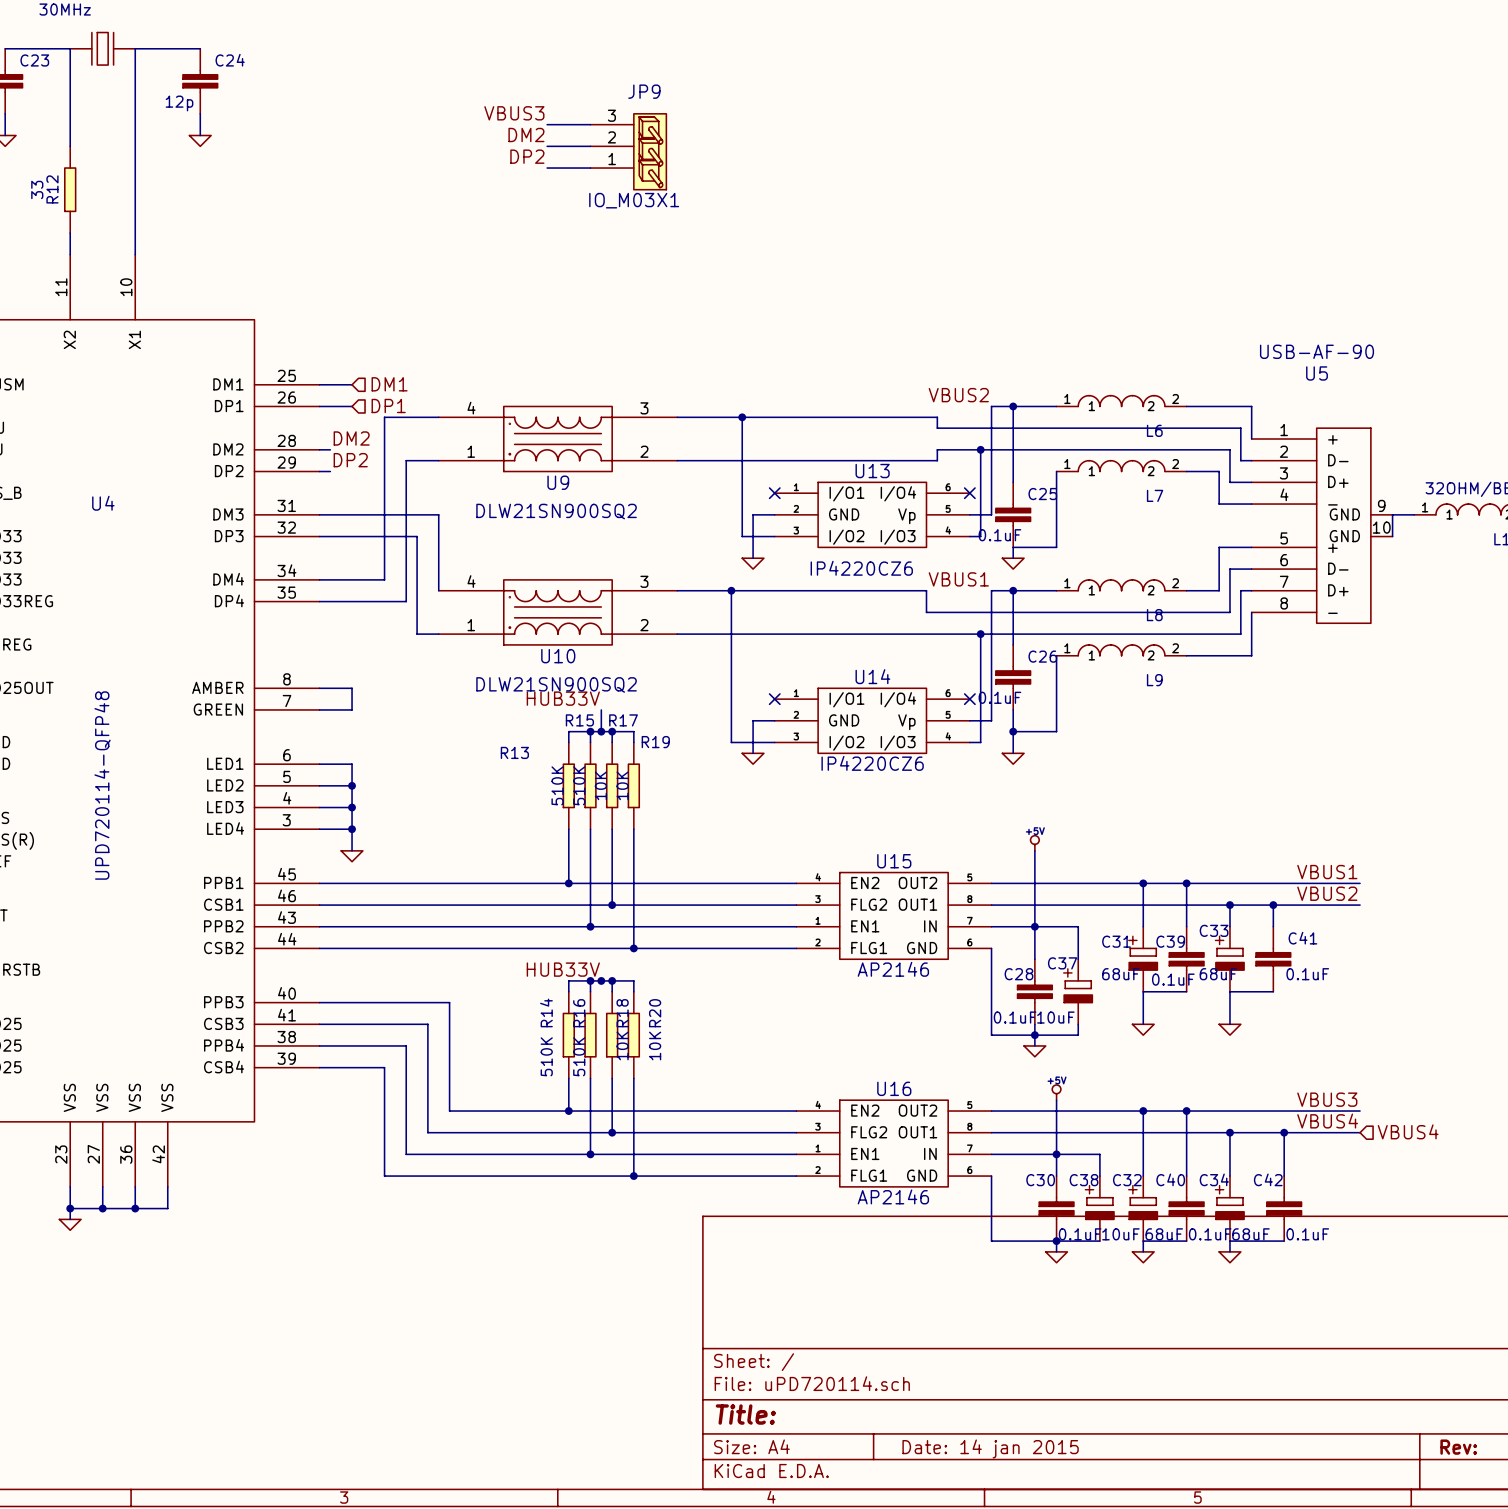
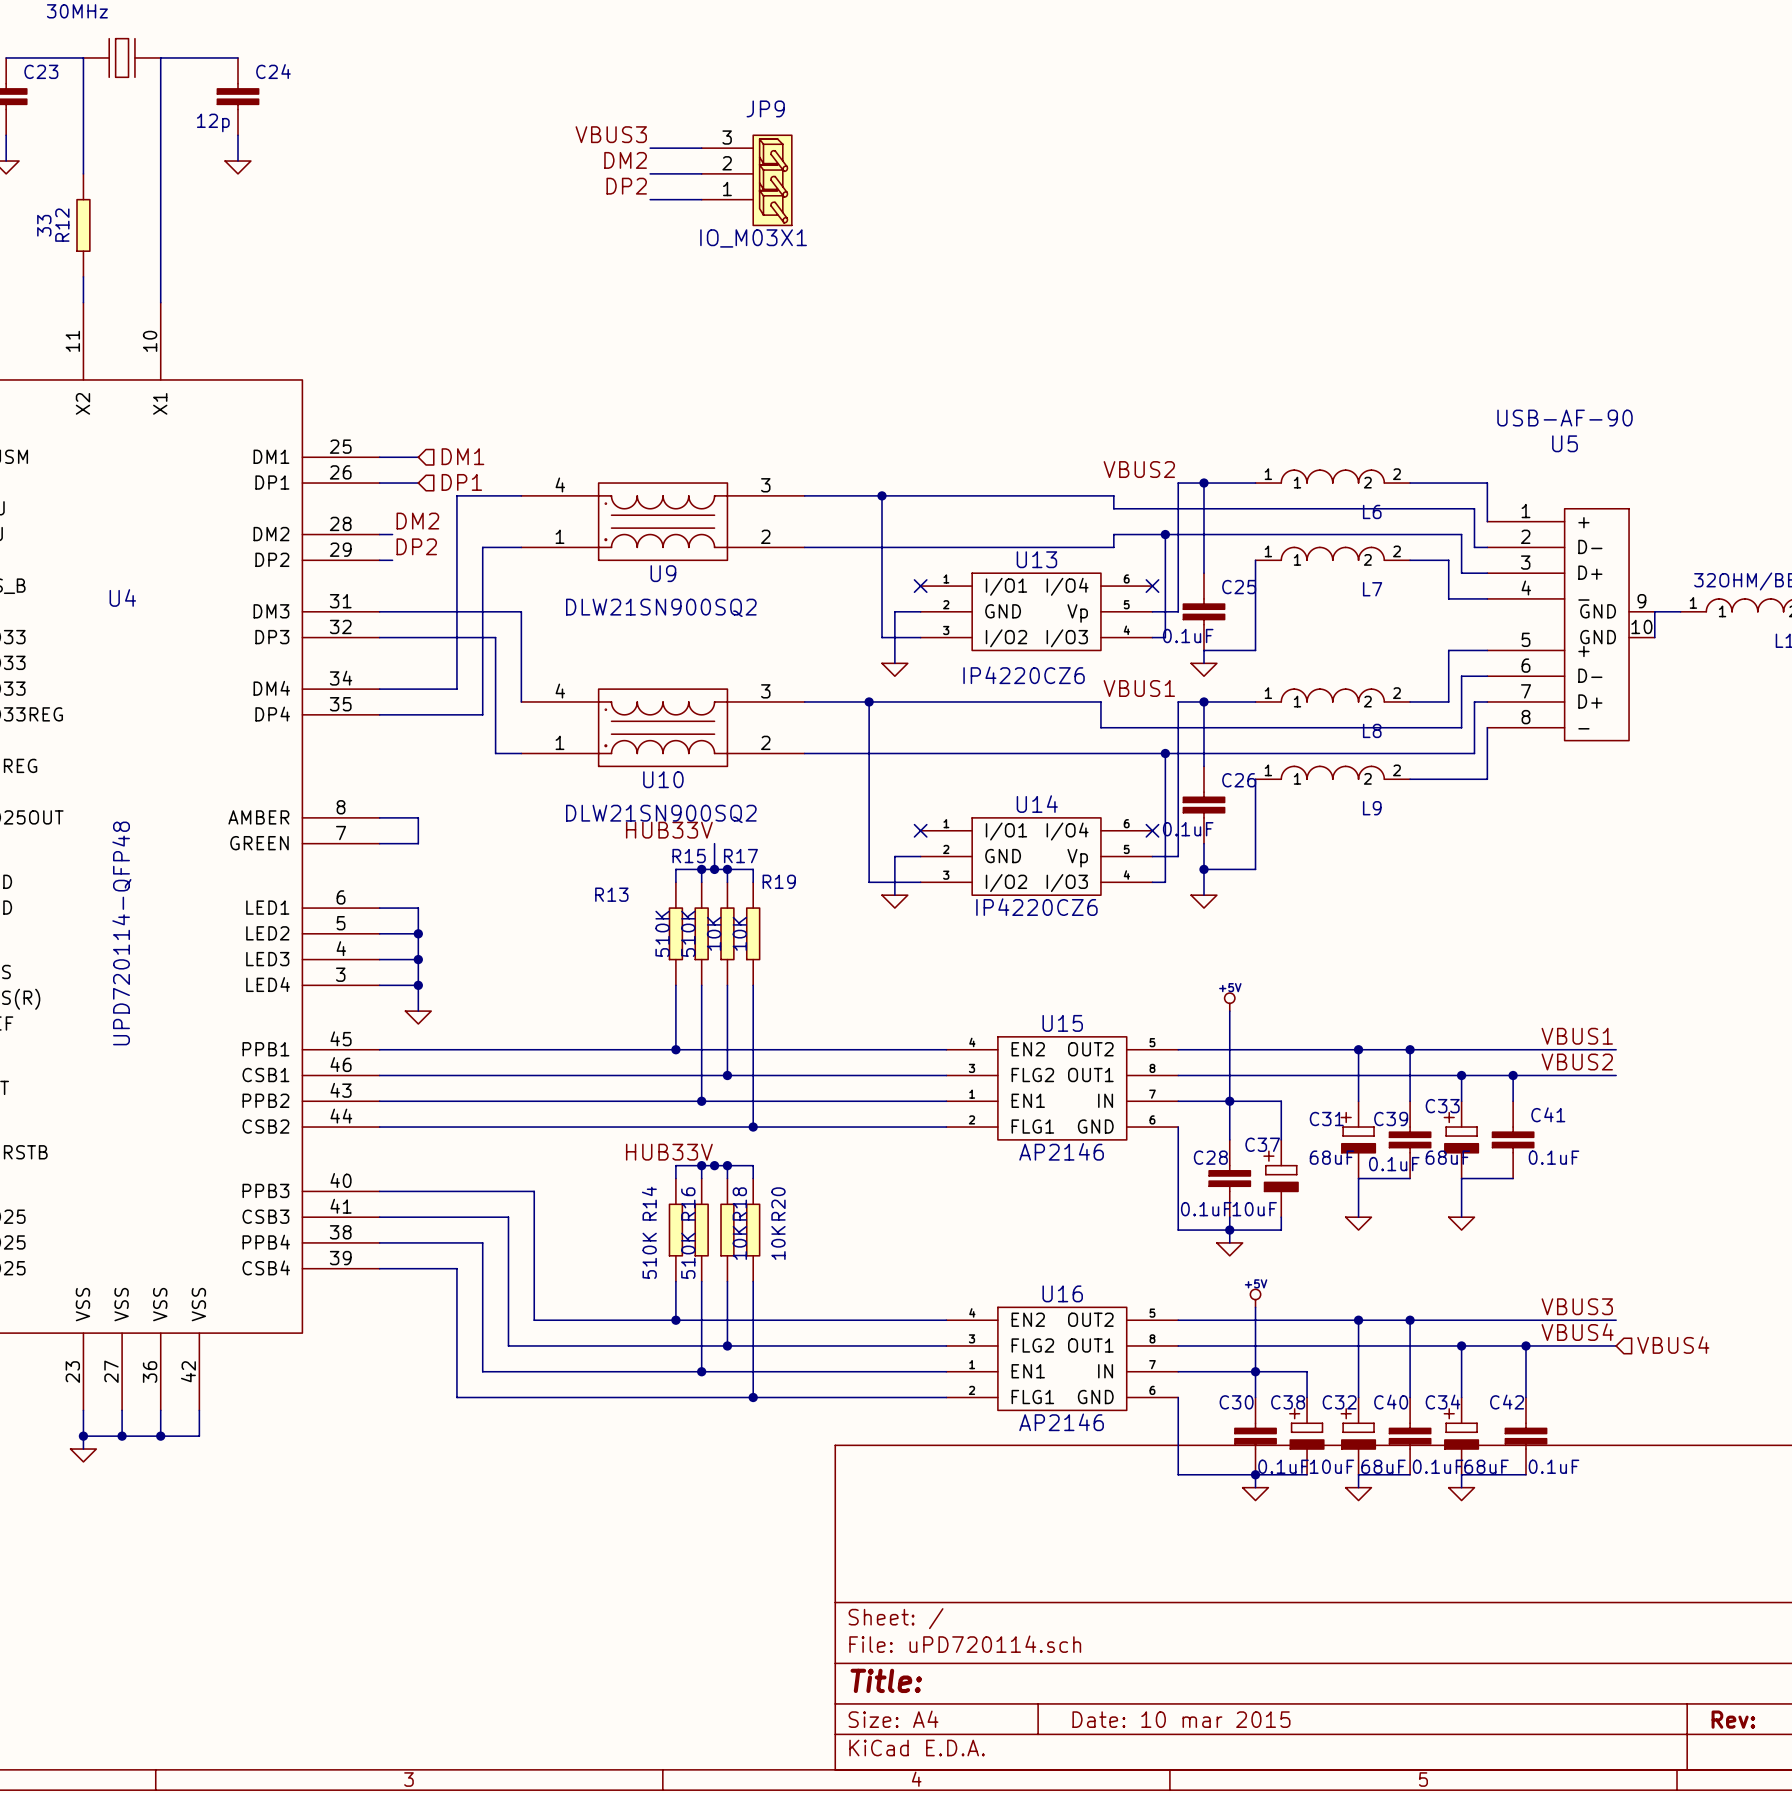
title block: Date: 14 jan 2015 (990, 1448) -> Date: 10 mar 2015 (1181, 1719)

